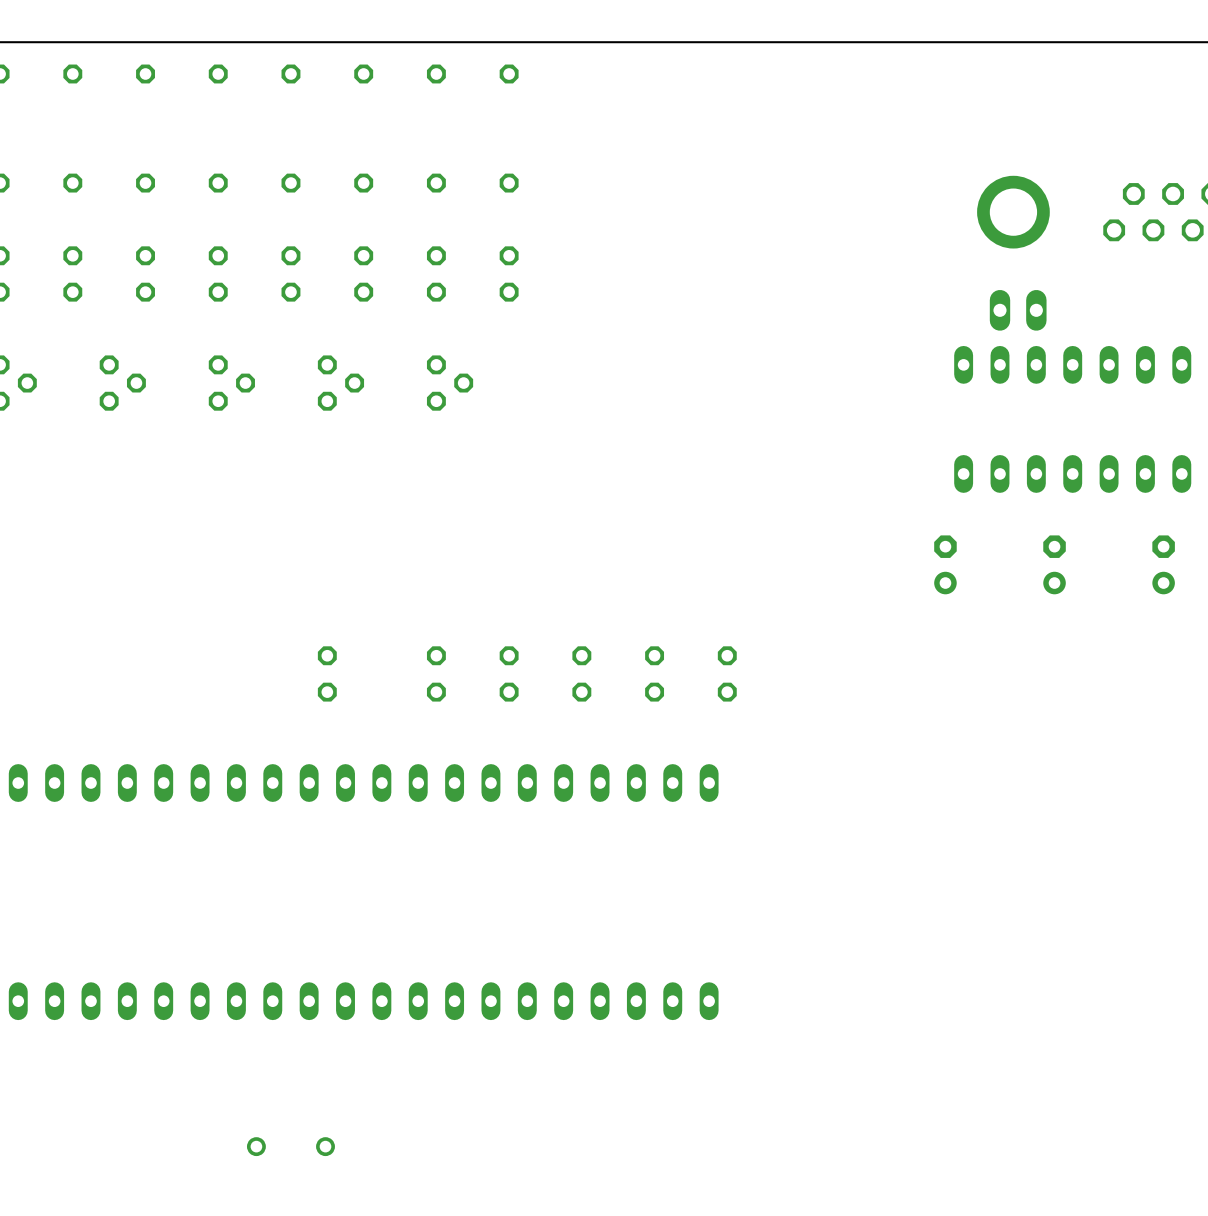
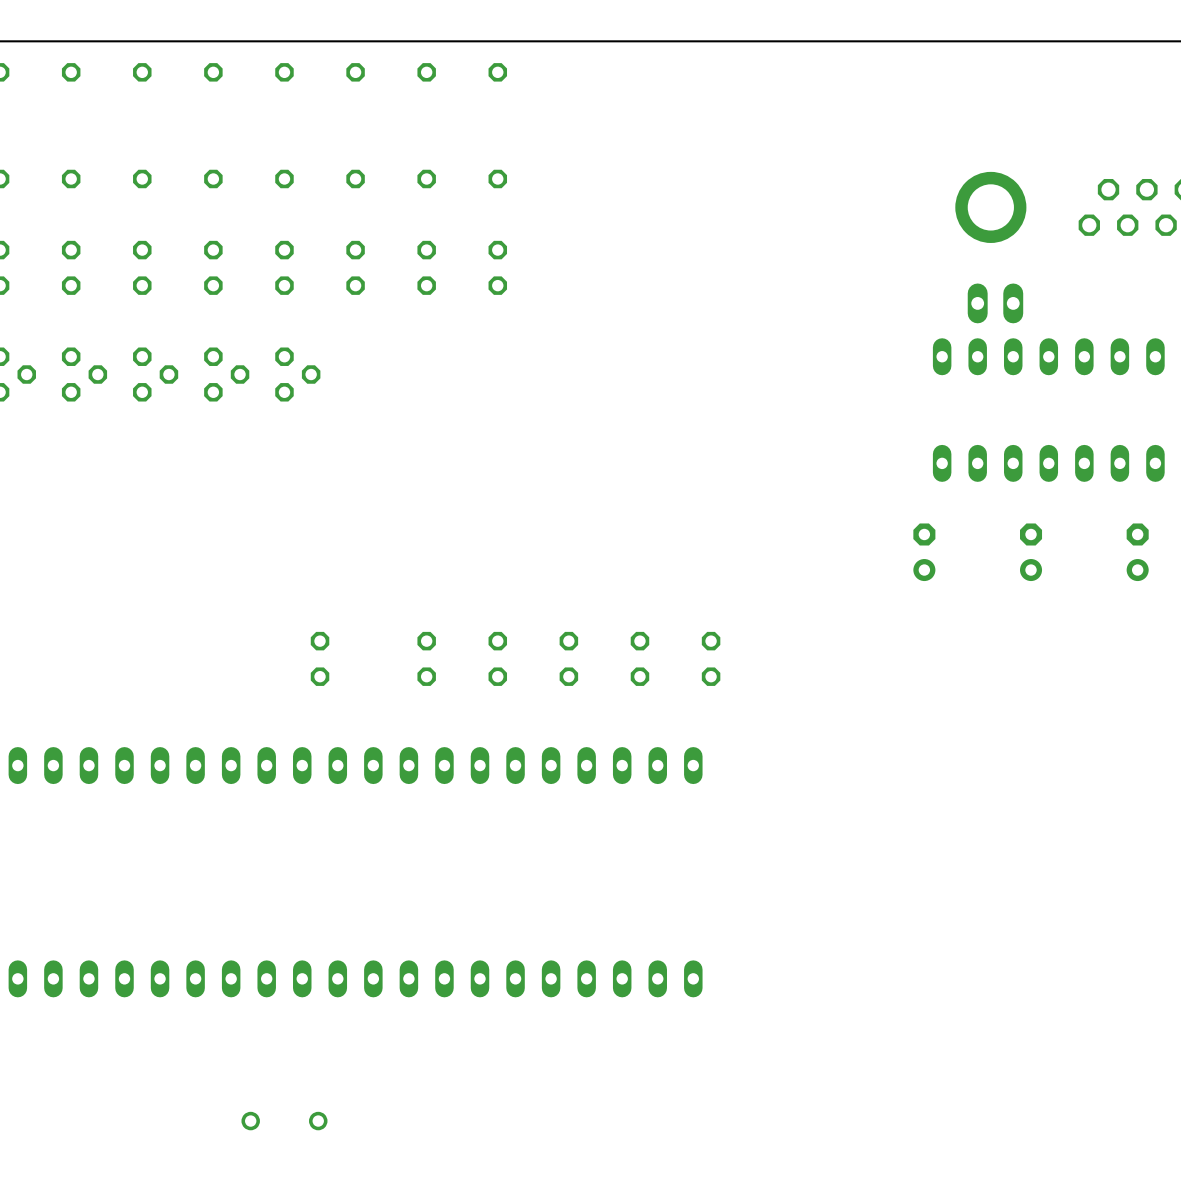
part: none -> (84, 374)
part: (122, 383) -> none
part: none -> (155, 374)
part position: (340, 383) -> (297, 374)
part: (450, 383) -> none

